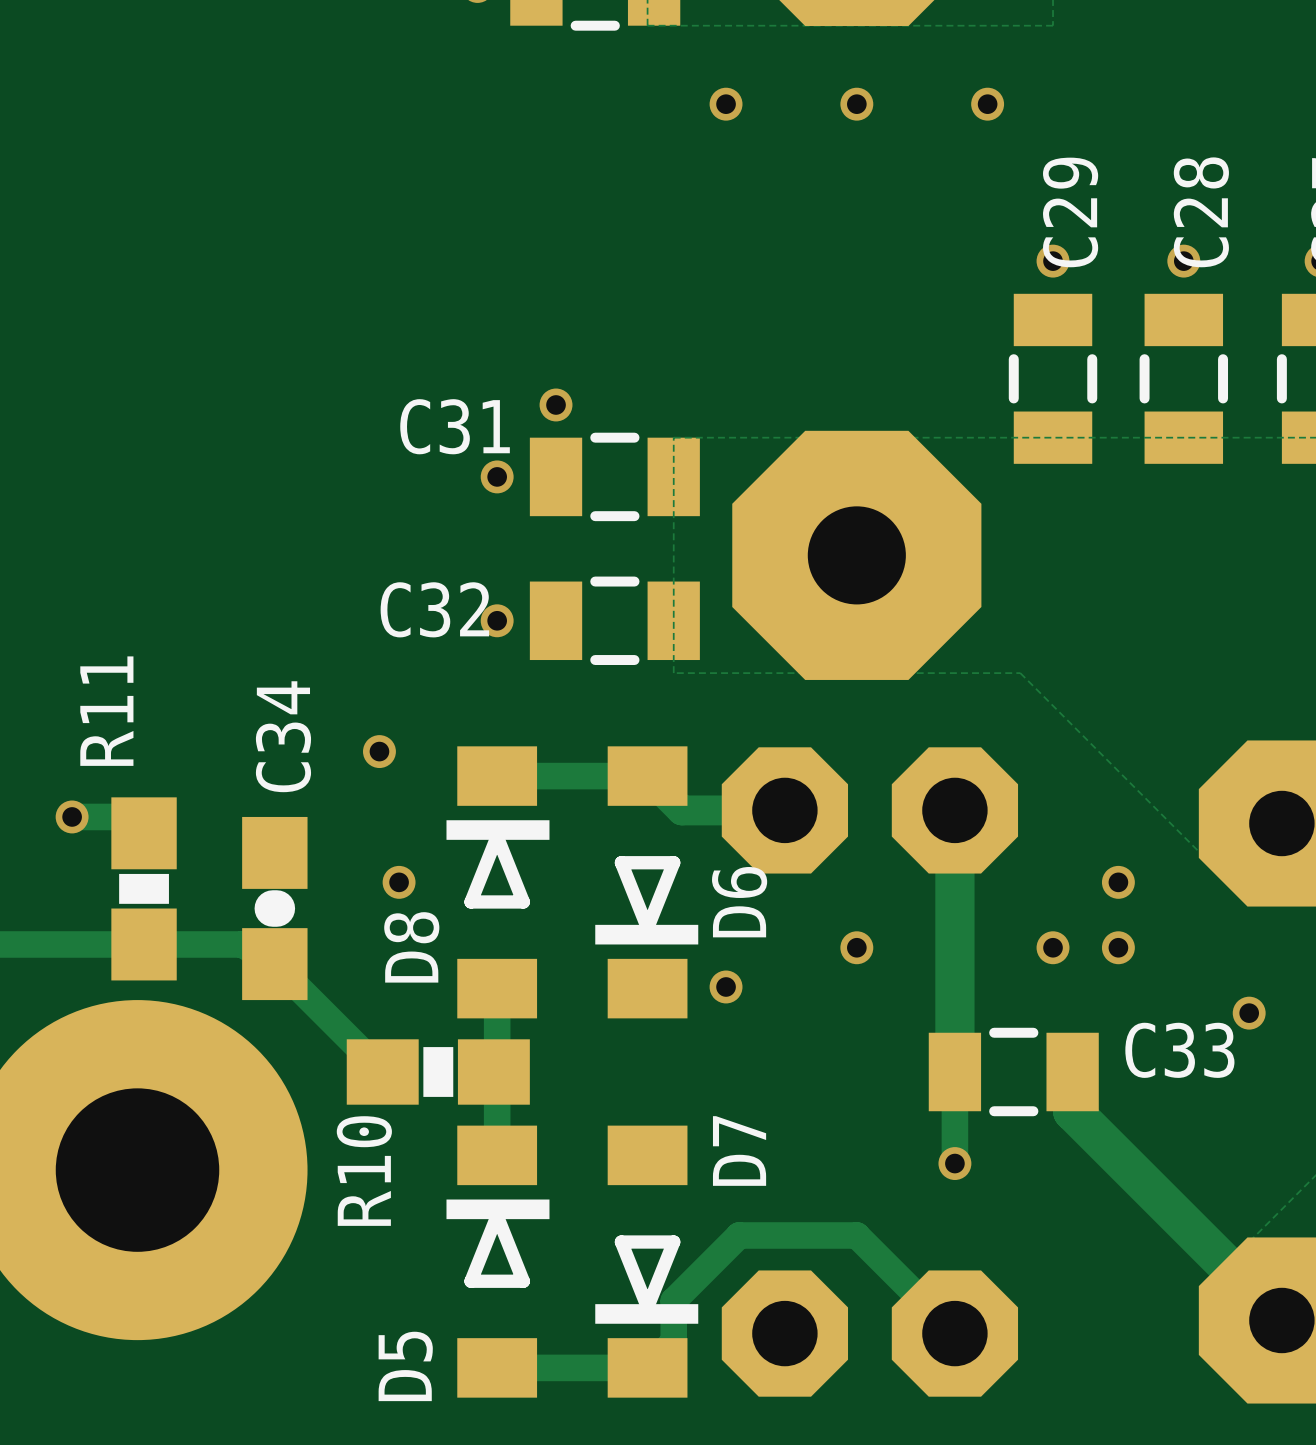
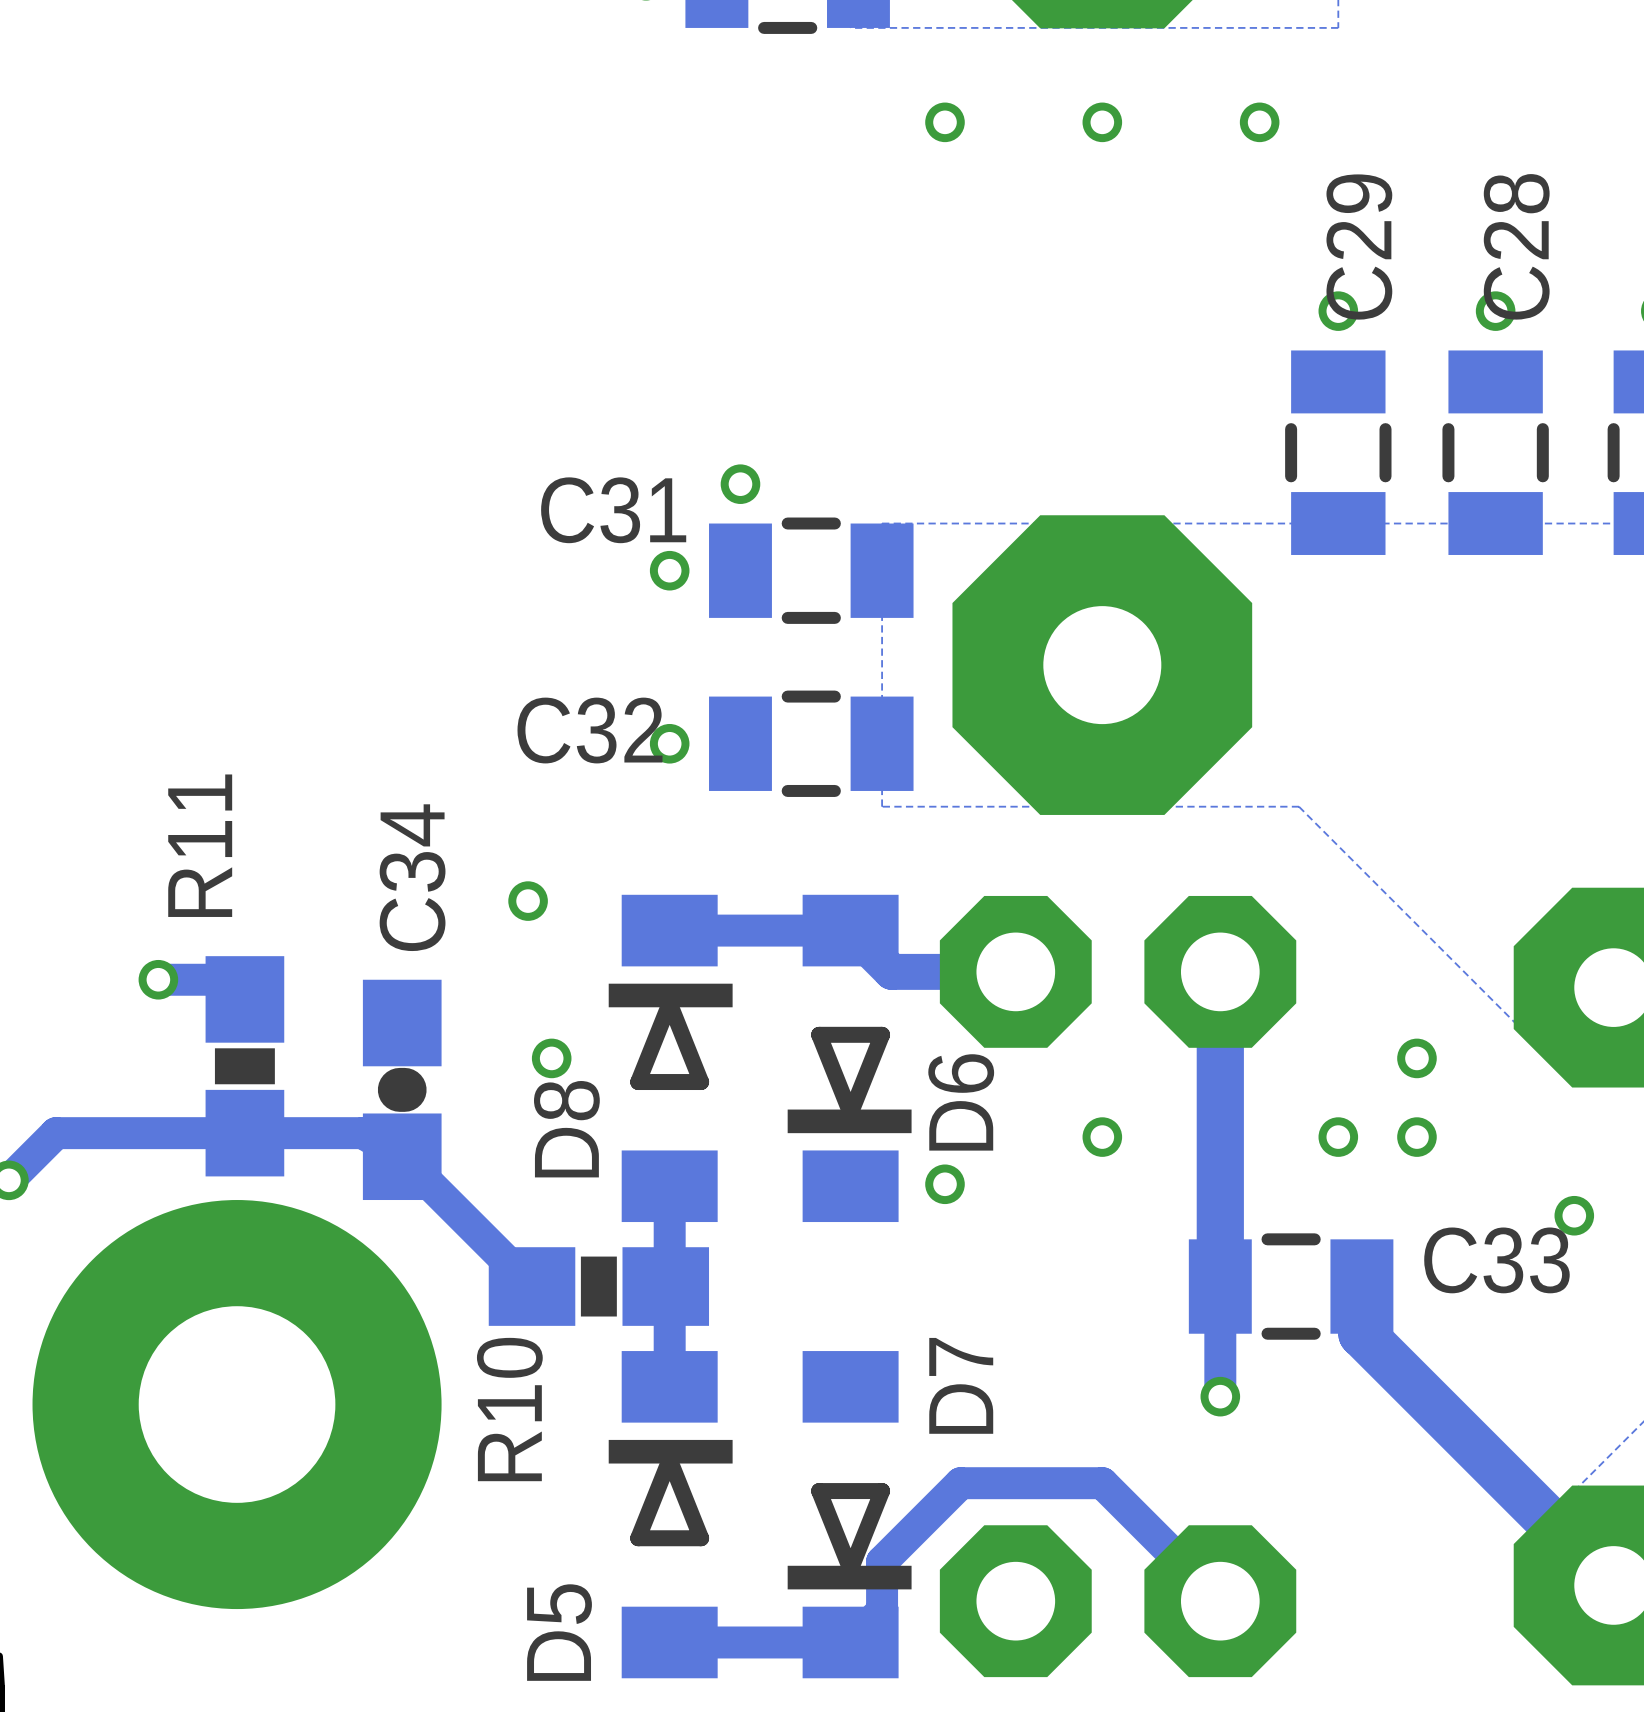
D6 name position: D6 (739, 902) -> D6 (961, 1102)

